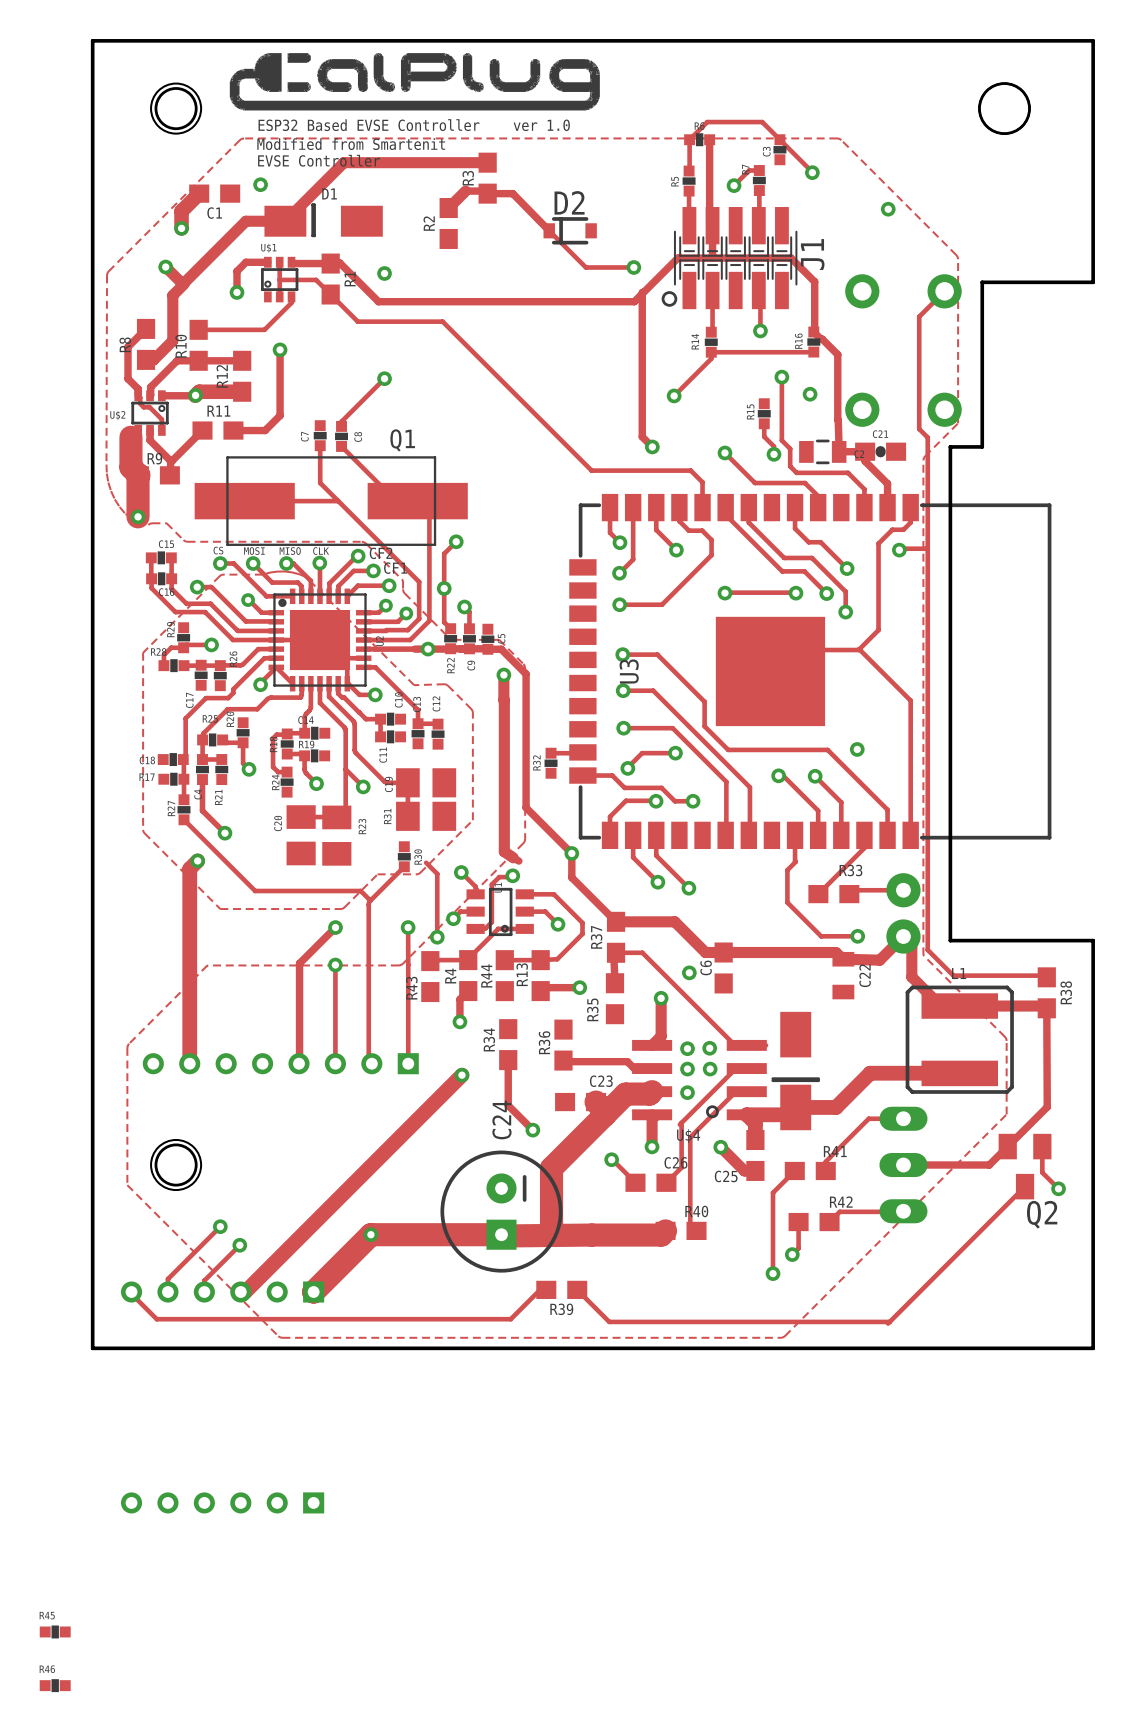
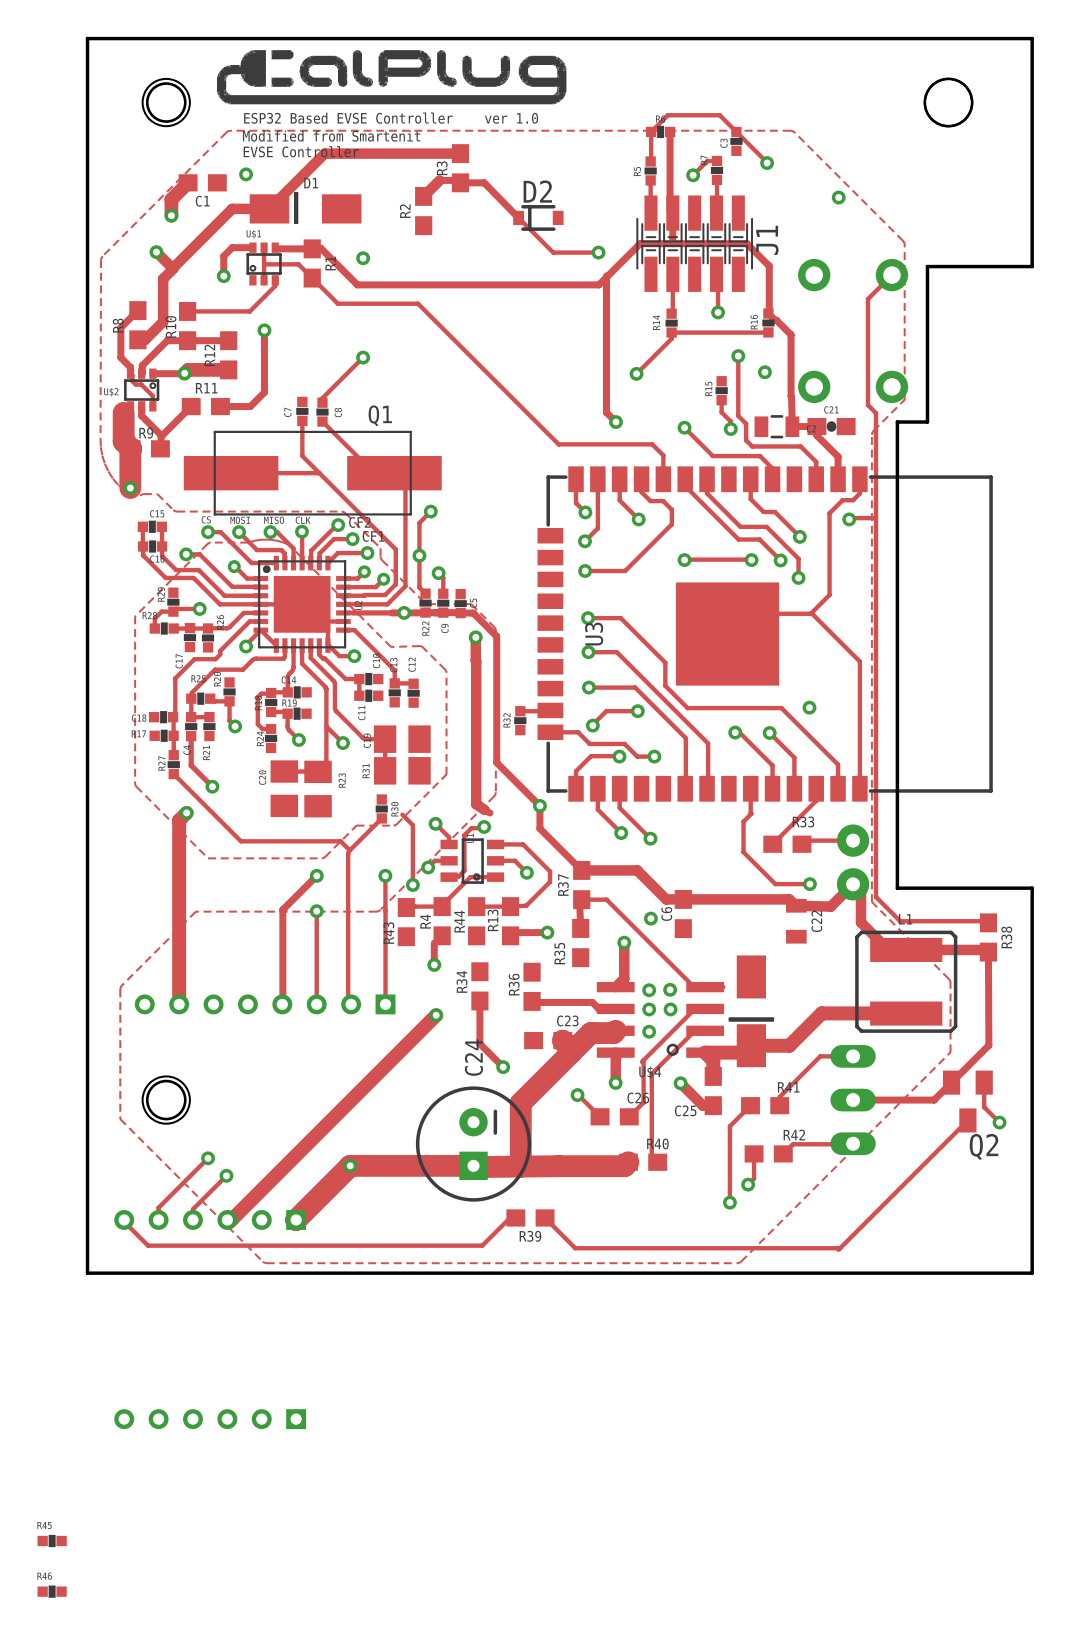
drawing: [661, 291, 678, 307] -> none

